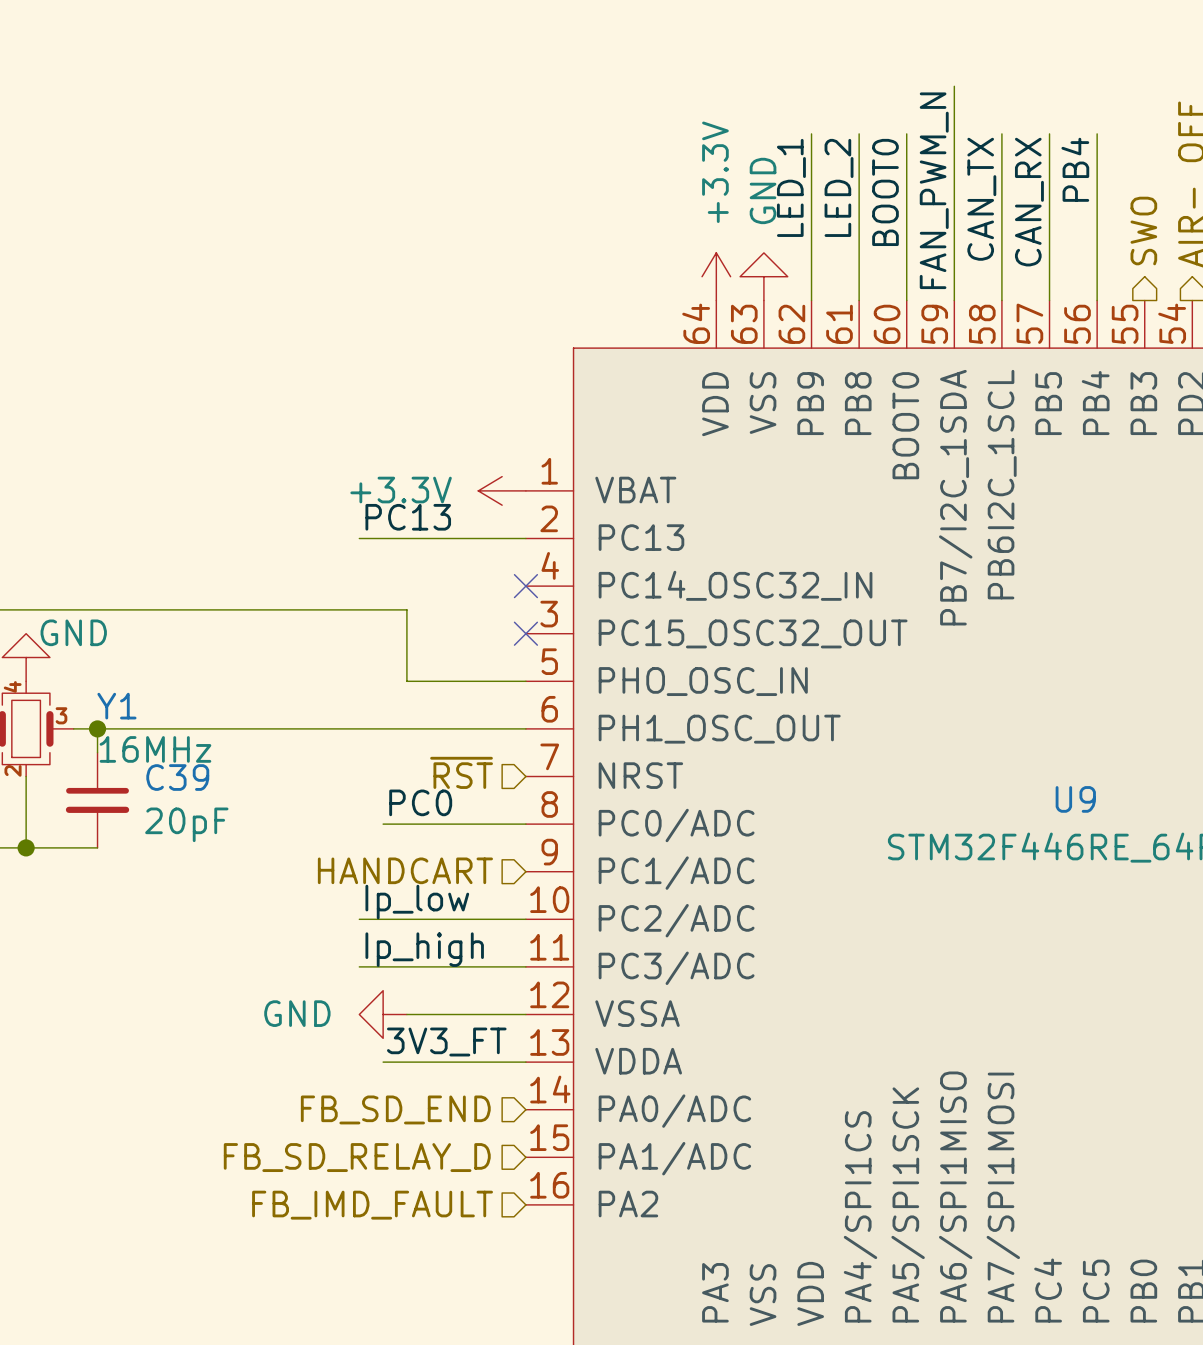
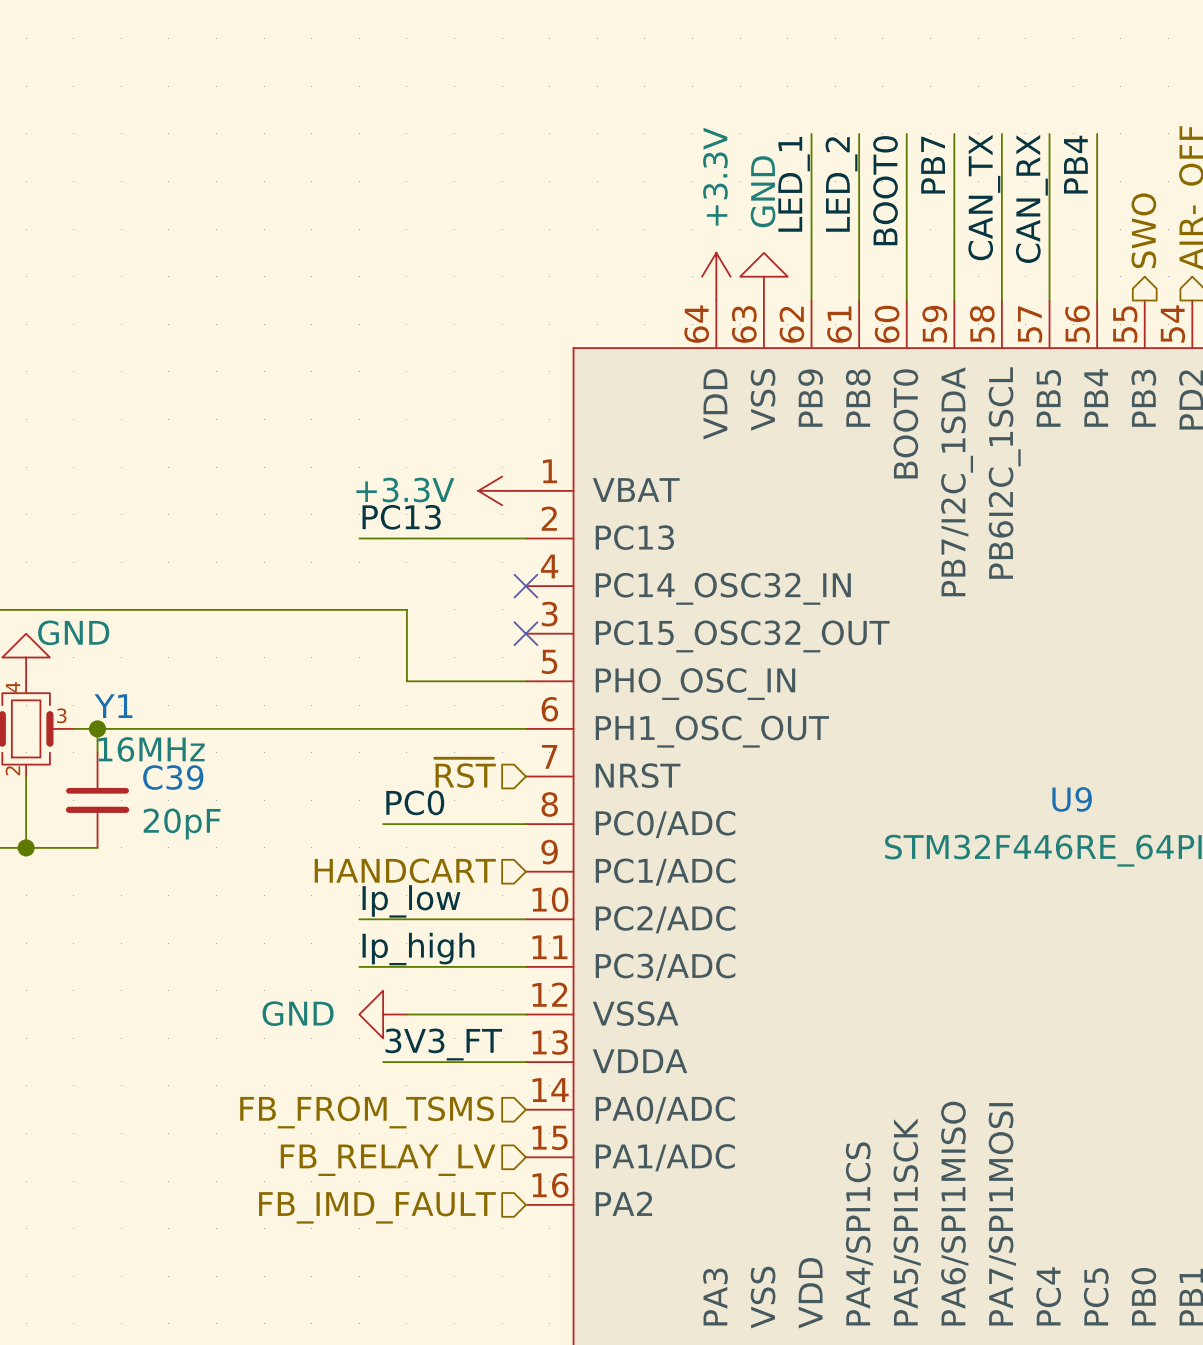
wire: (954, 86) (954, 133) -> none
label: none -> PB7 (933, 165)
label: FAN_PWM_N (934, 190) -> none
hierarchical label: FB_SD_END (395, 1109) -> FB_FROM_TSMS (367, 1112)
hierarchical label: FB_SD_RELAY_D (357, 1157) -> FB_RELAY_LV (388, 1160)

